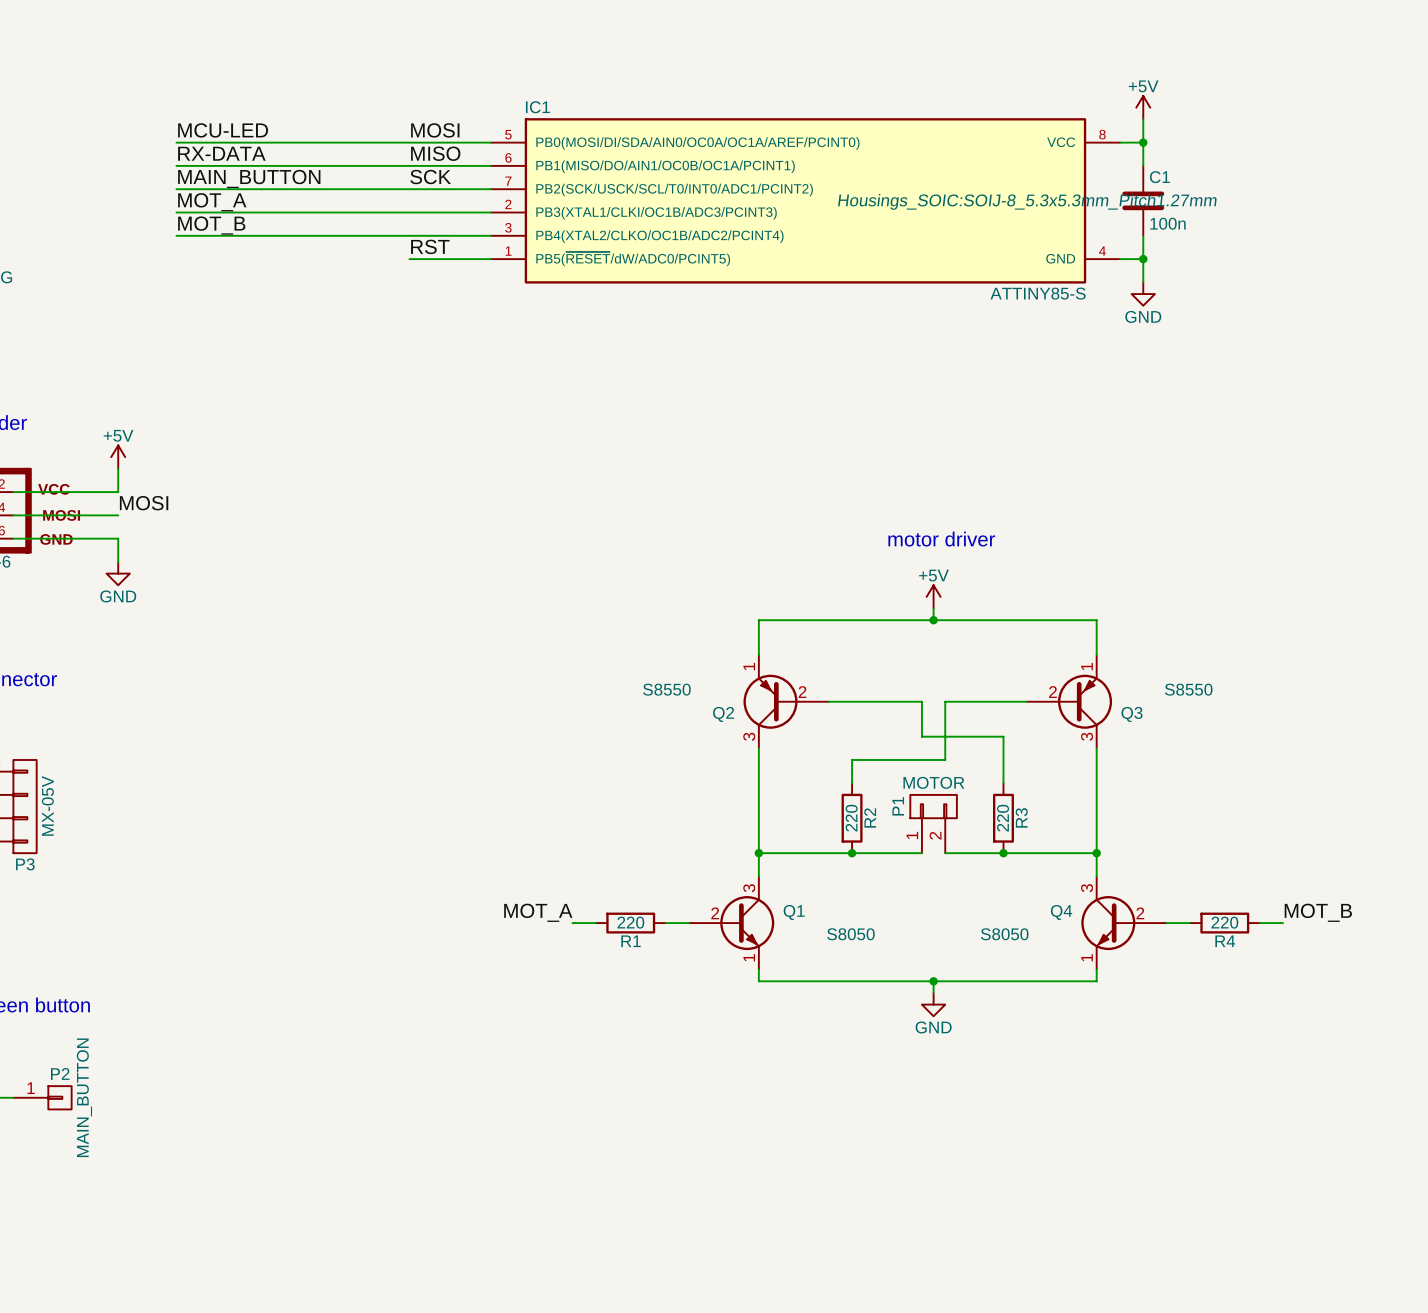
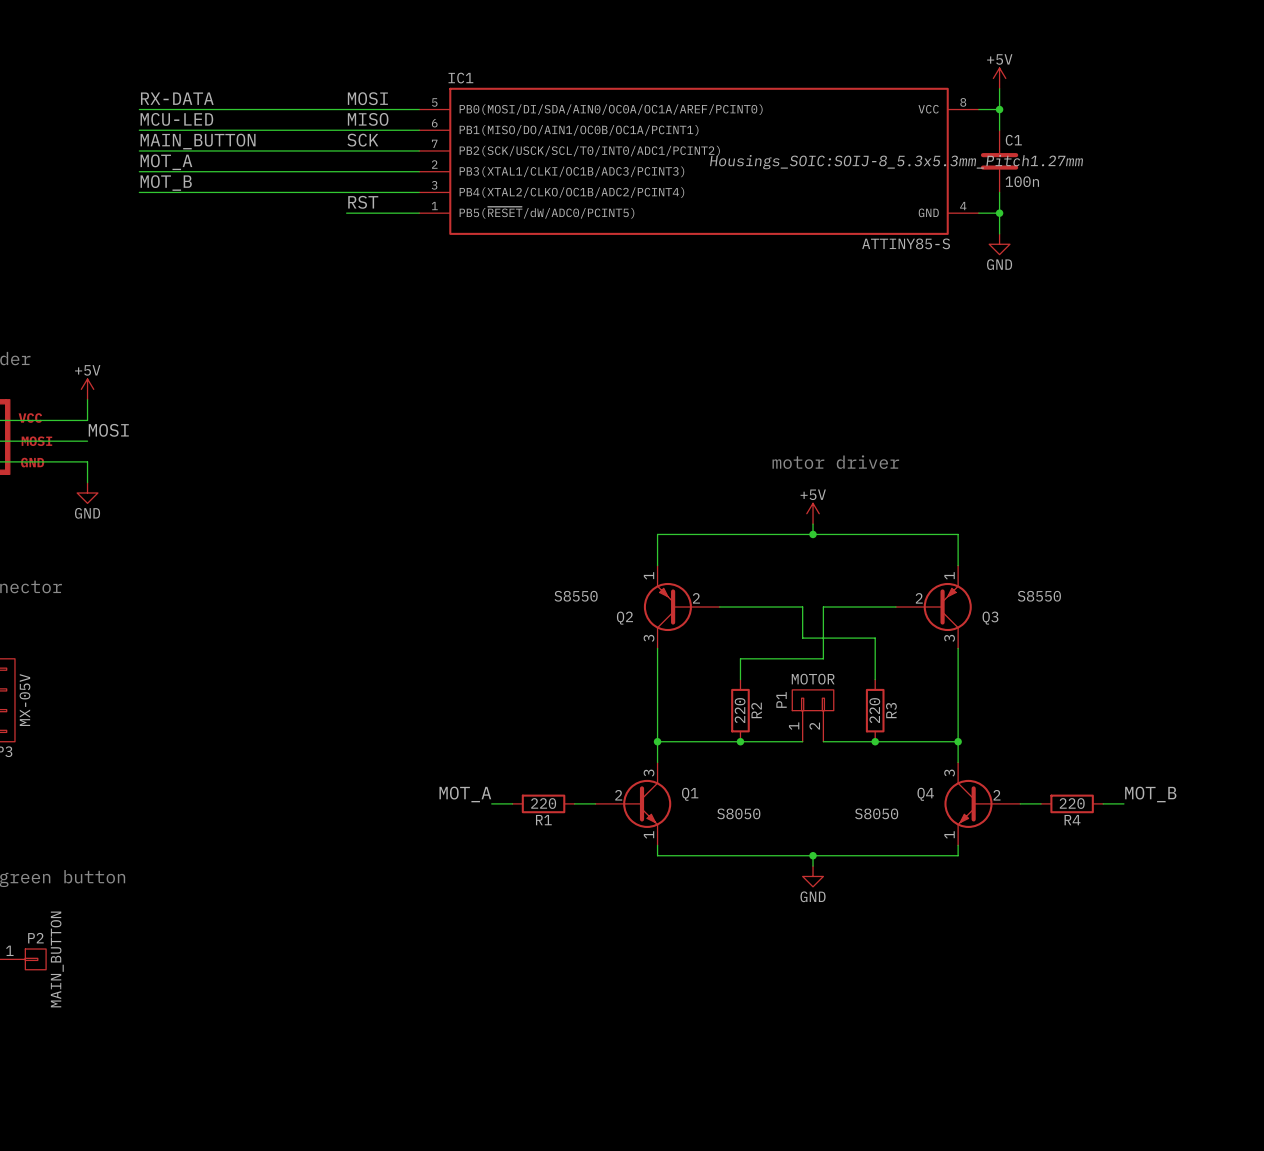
label: MCU-LED (223, 130) -> RX-DATA (177, 98)
label: RX-DATA (221, 153) -> MCU-LED (176, 119)

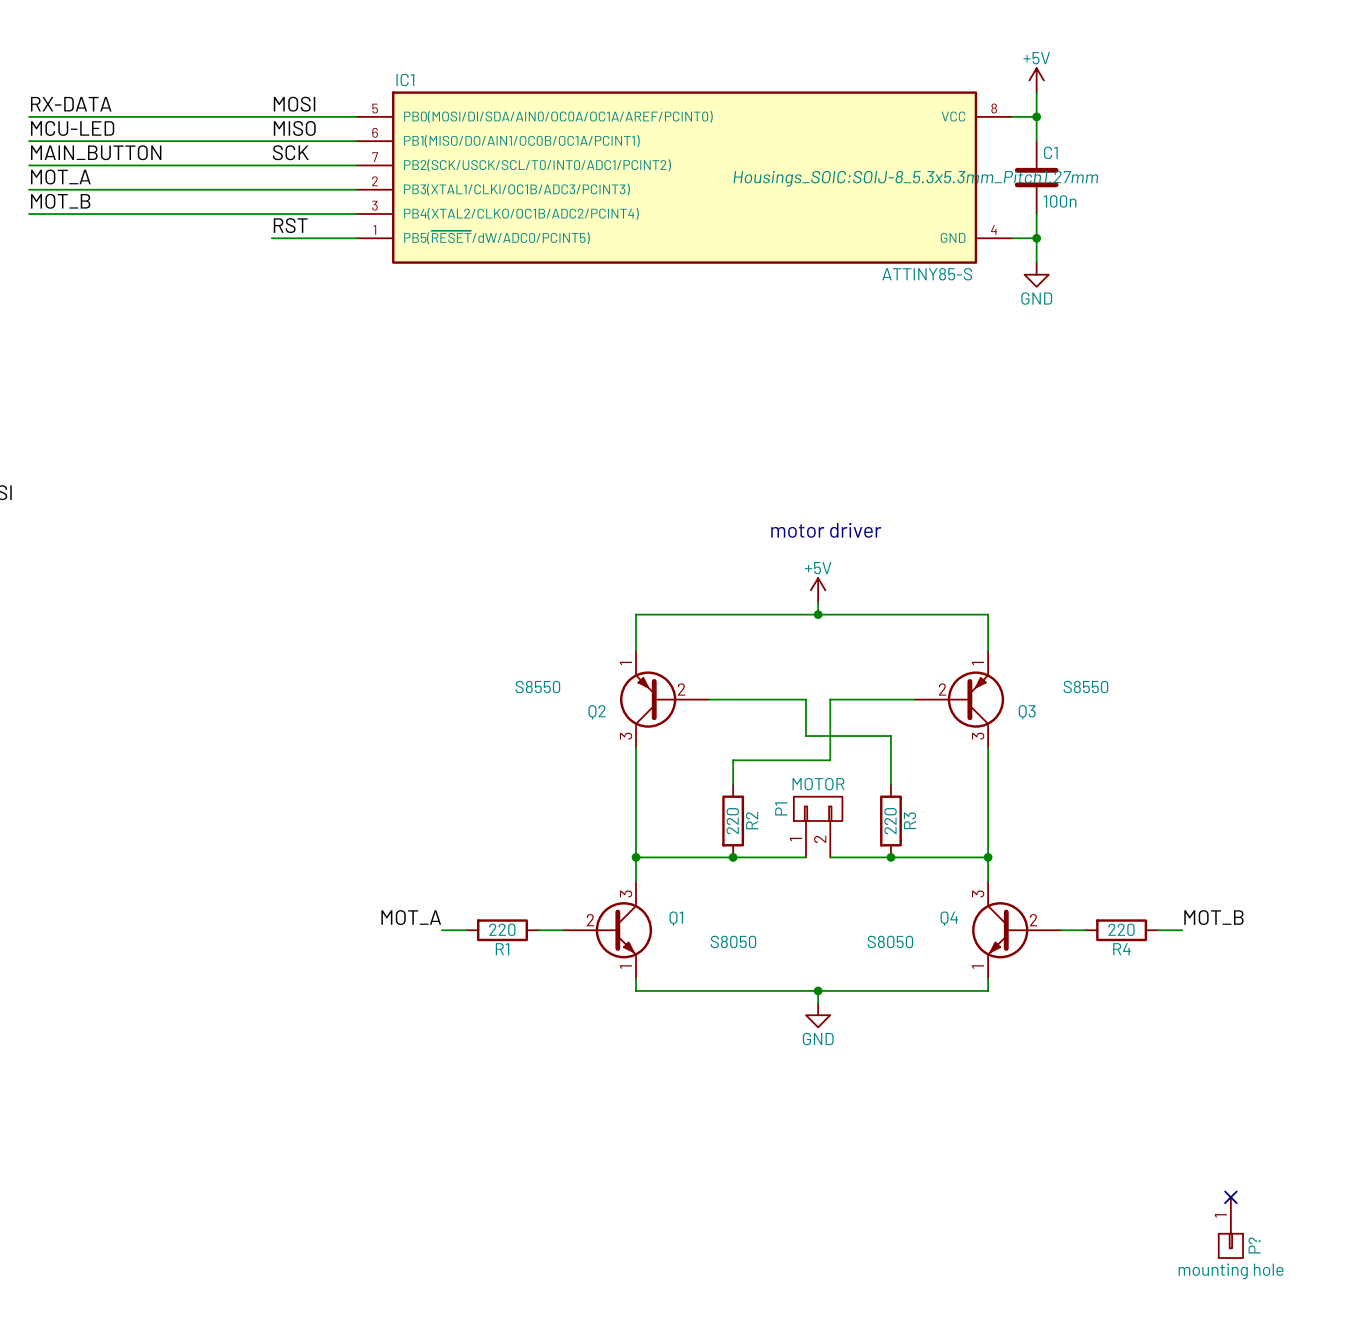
no-connect mark: none -> (1230, 1197)
P?: none -> mounting hole (1230, 1227)

